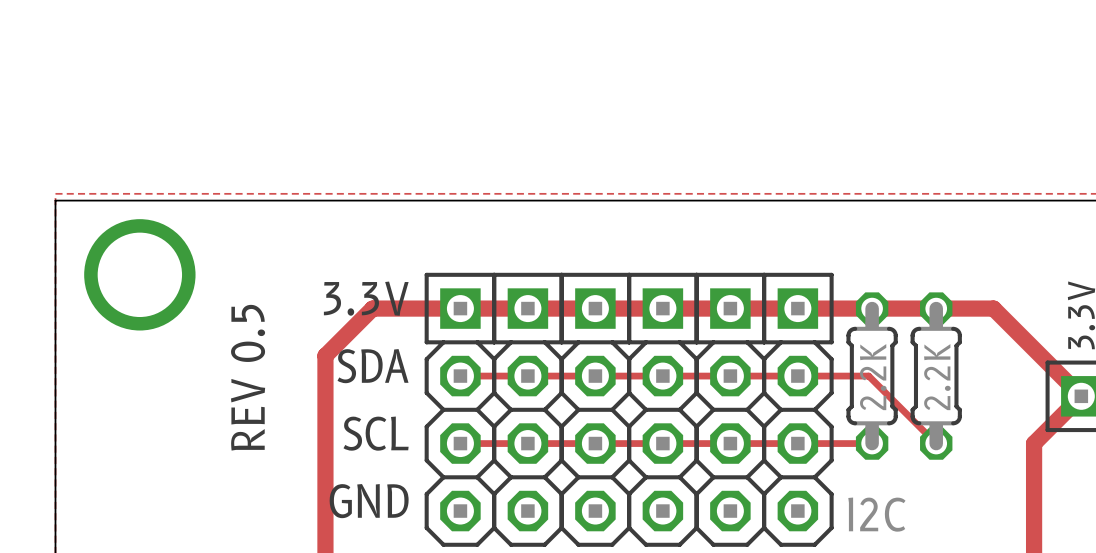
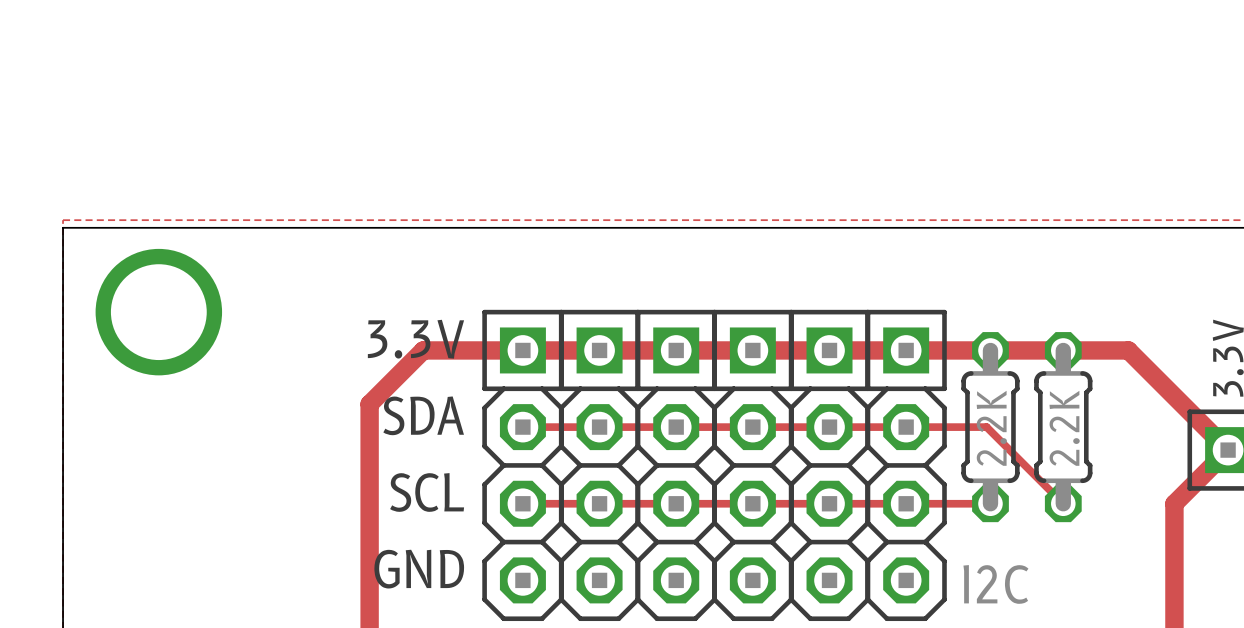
text: REV 0.5 (248, 377) -> none

